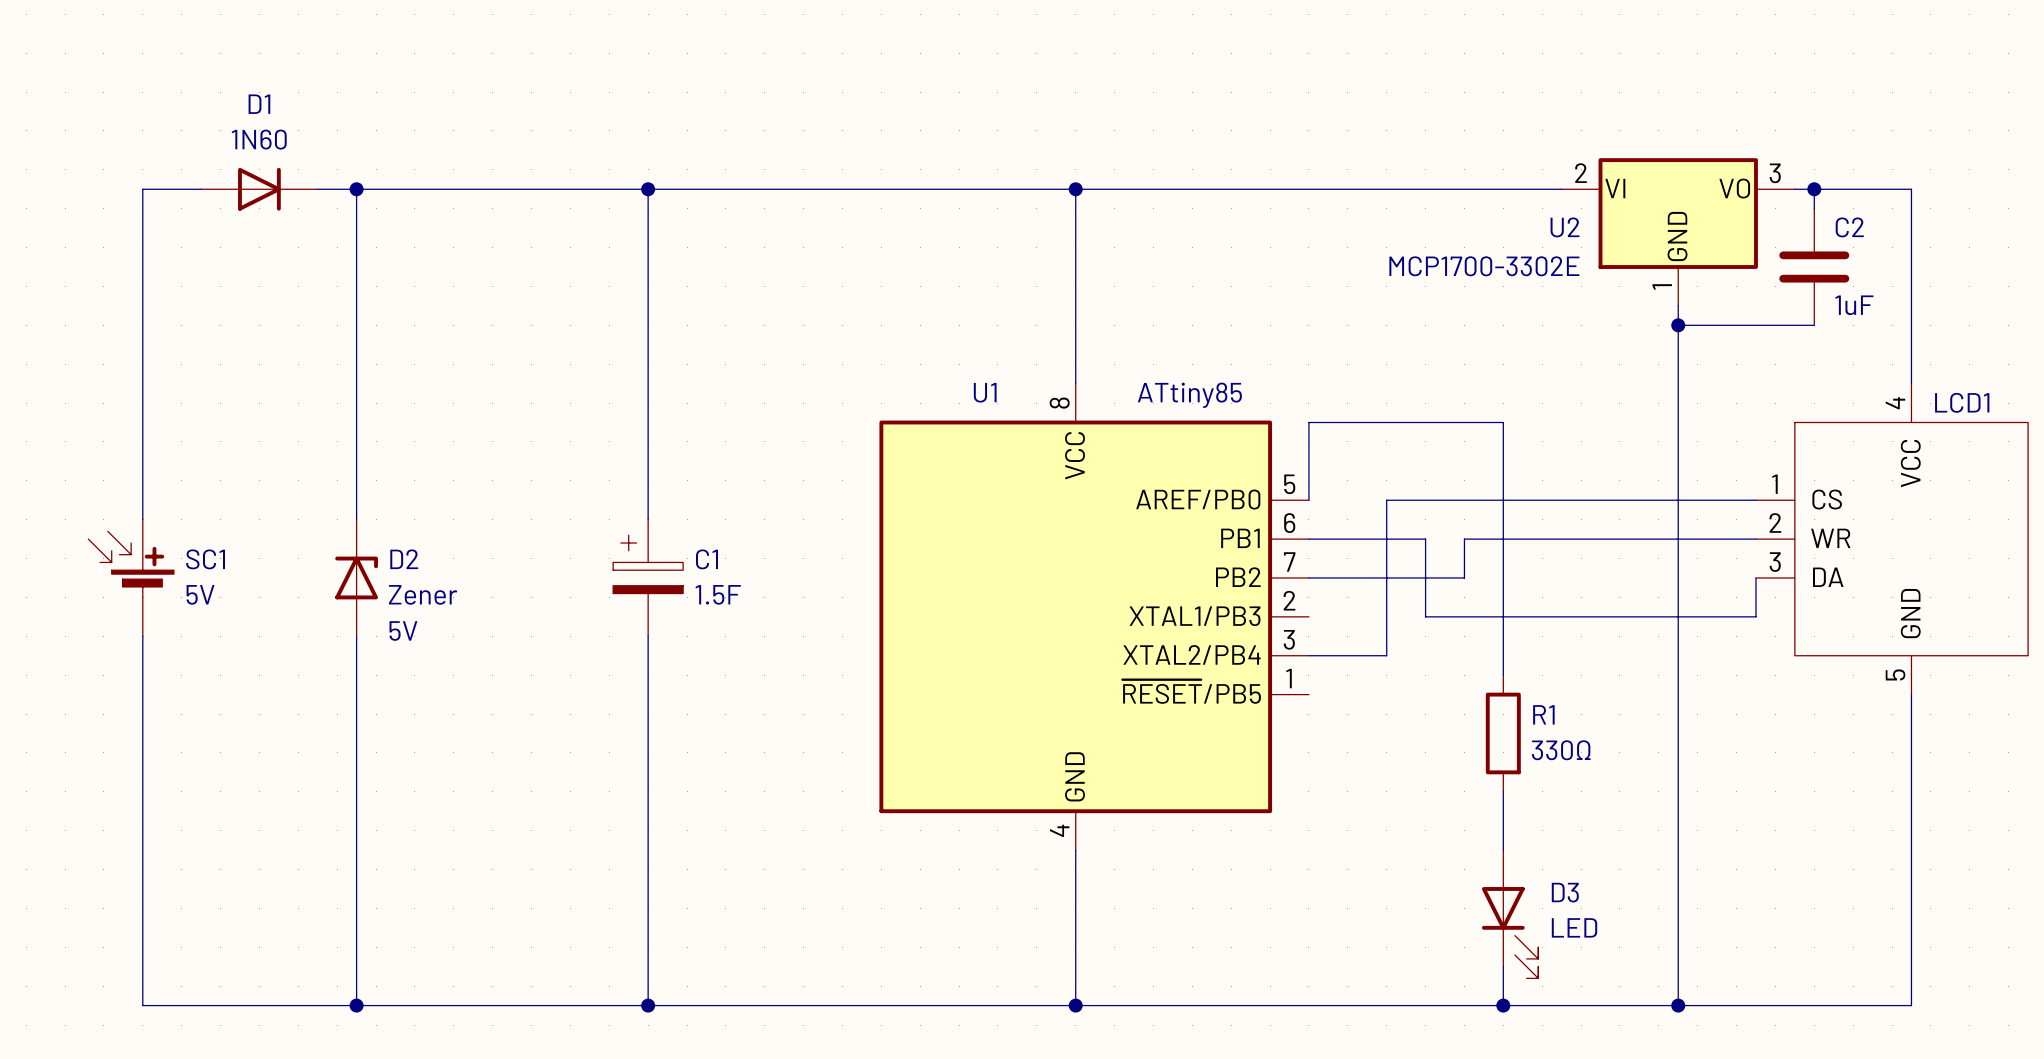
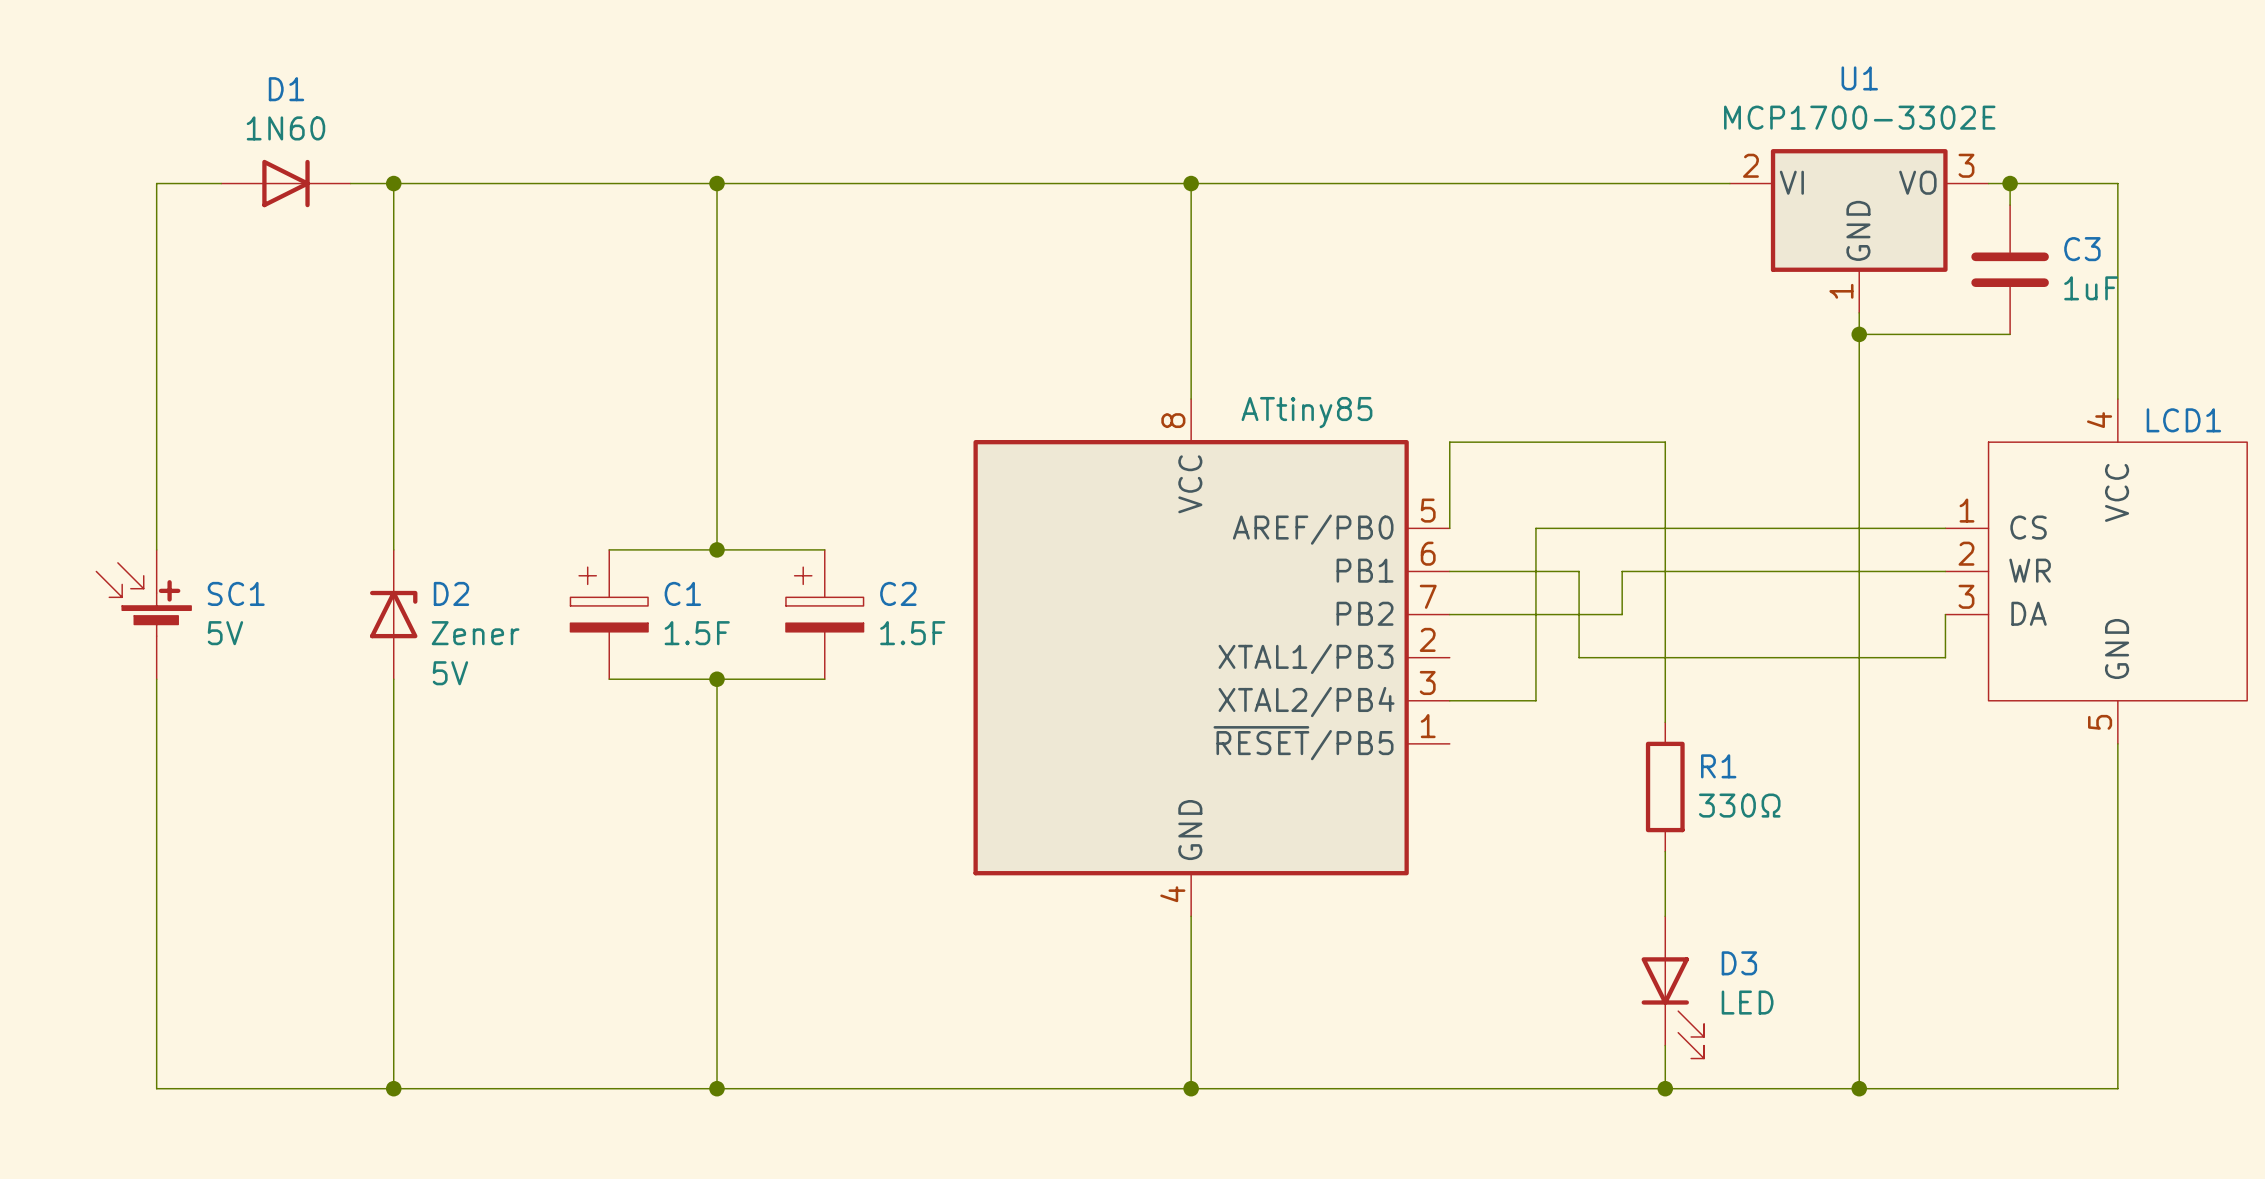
U2 name: U2 (1565, 227) -> U1 (1859, 78)
C2 name: C2 (1849, 227) -> C3 (2082, 249)
U2 value position: MCP1700-3302E (1484, 266) -> MCP1700-3302E (1859, 117)
C2 value position: 1uF (1854, 305) -> 1uF (2091, 288)
U1 name: U1 (985, 392) -> none
wire: none -> (609, 549) (824, 549)
junction: none -> (717, 549)
C1 position: (648, 577) -> (609, 614)
C2: none -> 1.5F (824, 614)
wire: none -> (609, 679) (824, 679)
junction: none -> (717, 679)

